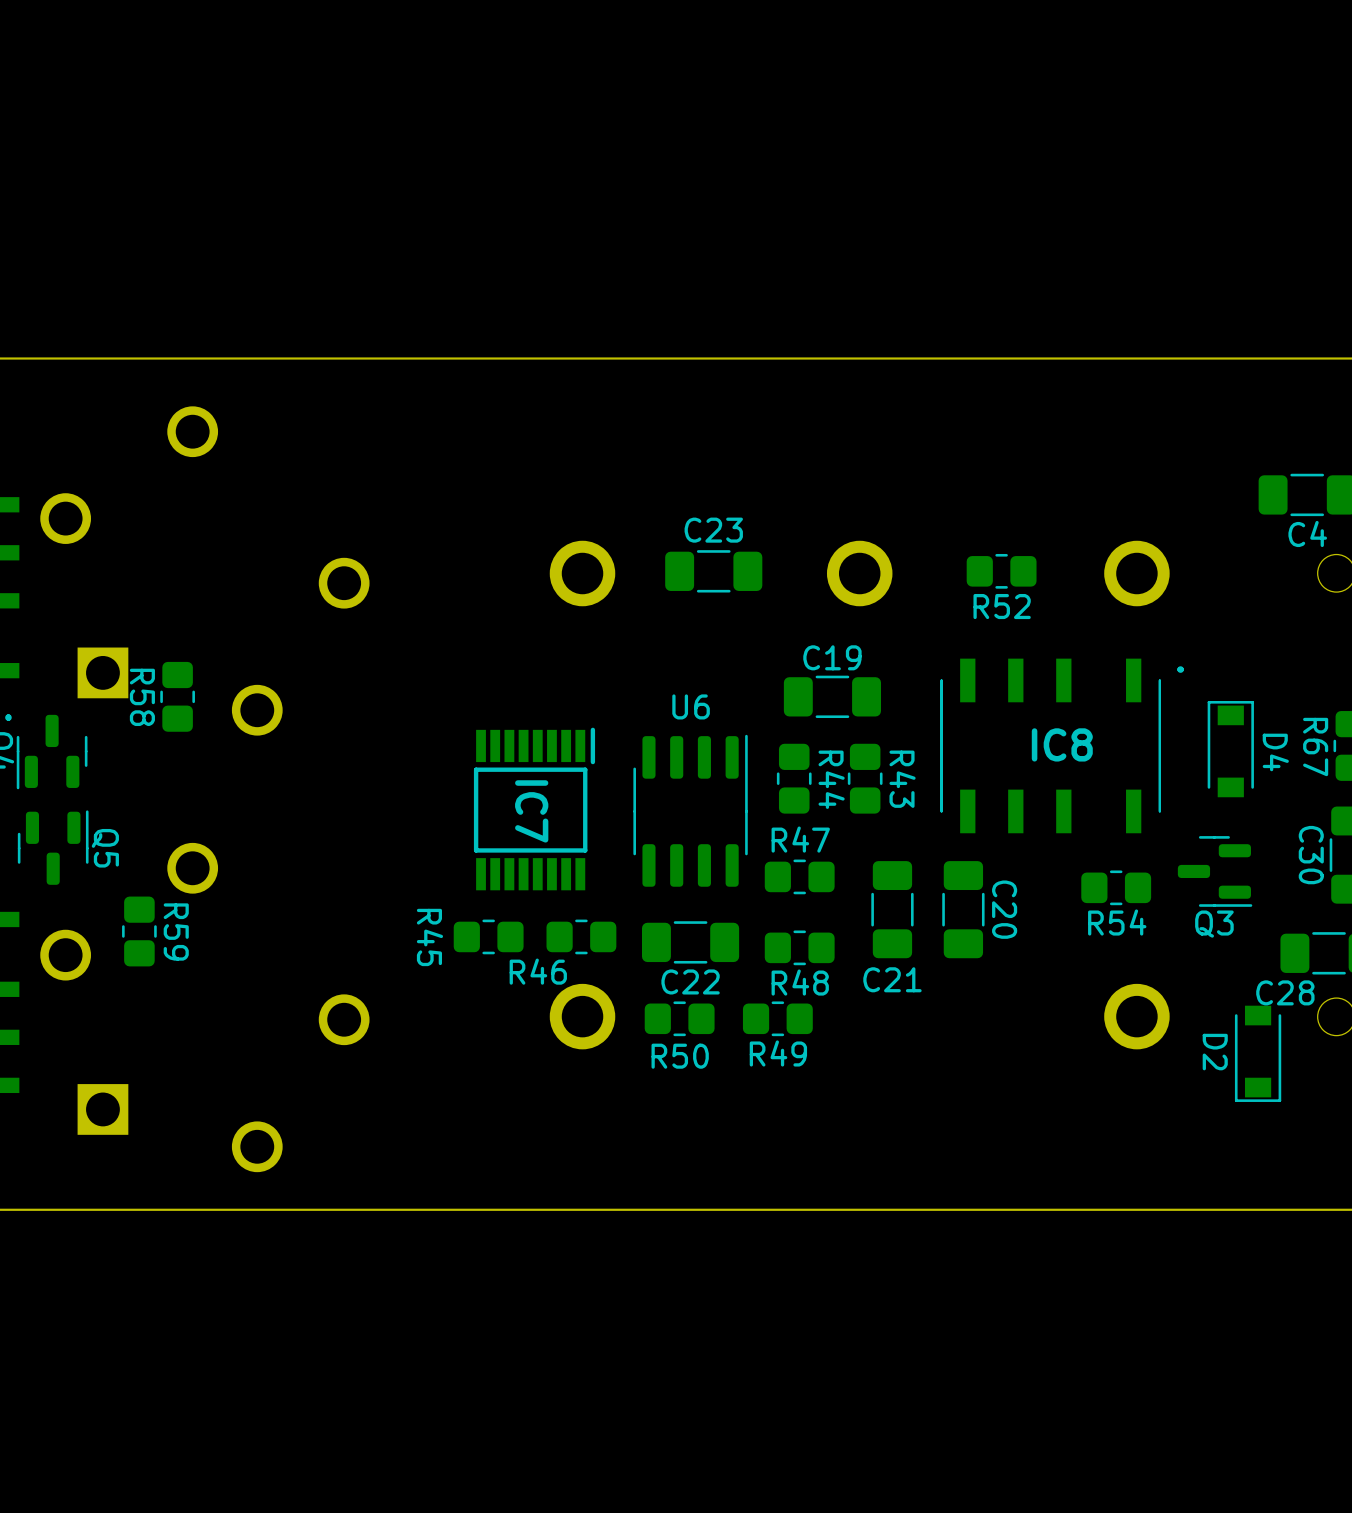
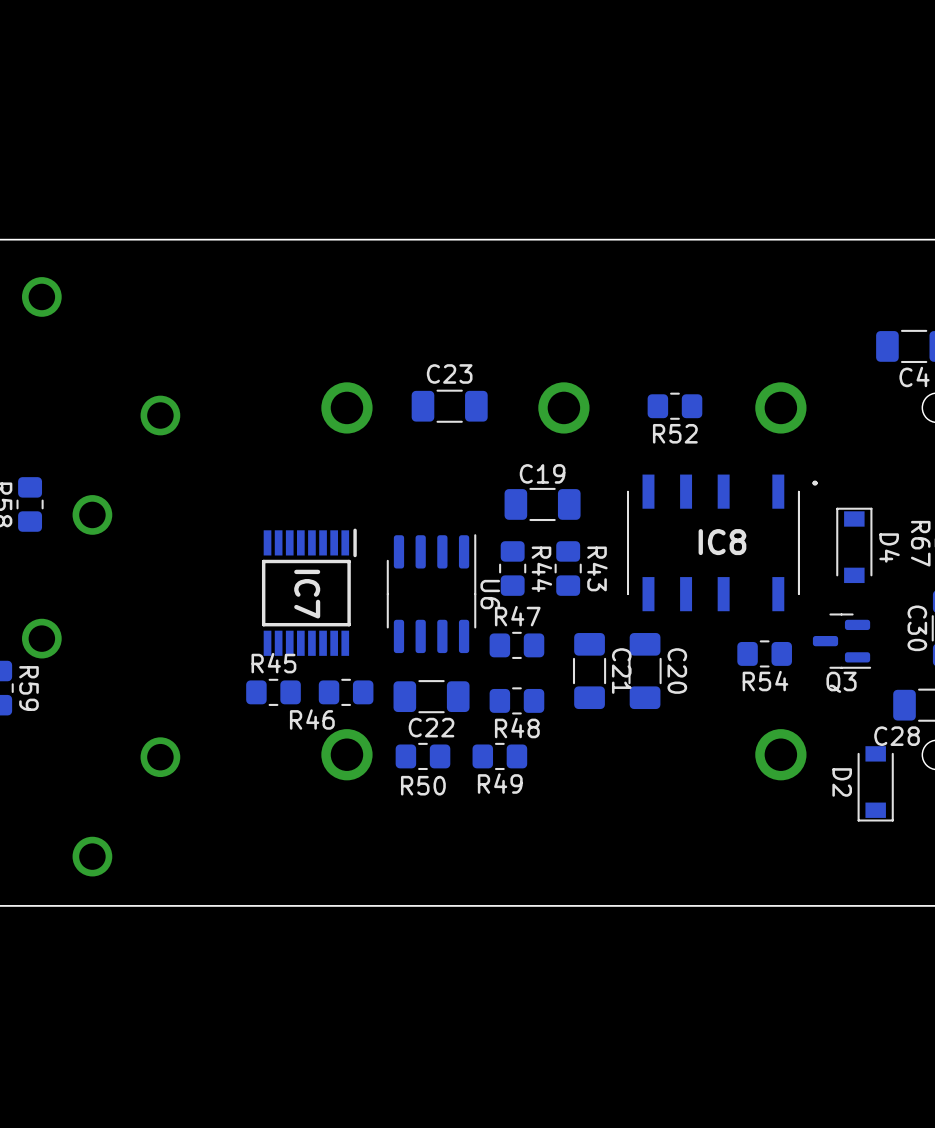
U6 name rotation: 0° (691, 706) -> 90° clockwise (490, 594)
U6 name position: U6 (691, 706) -> U6 (490, 594)
R45 name rotation: 0° (429, 937) -> 90° counterclockwise (273, 663)
C21 name rotation: 0° (892, 979) -> 90° clockwise (621, 671)
C21 name position: C21 (892, 979) -> C21 (621, 671)

